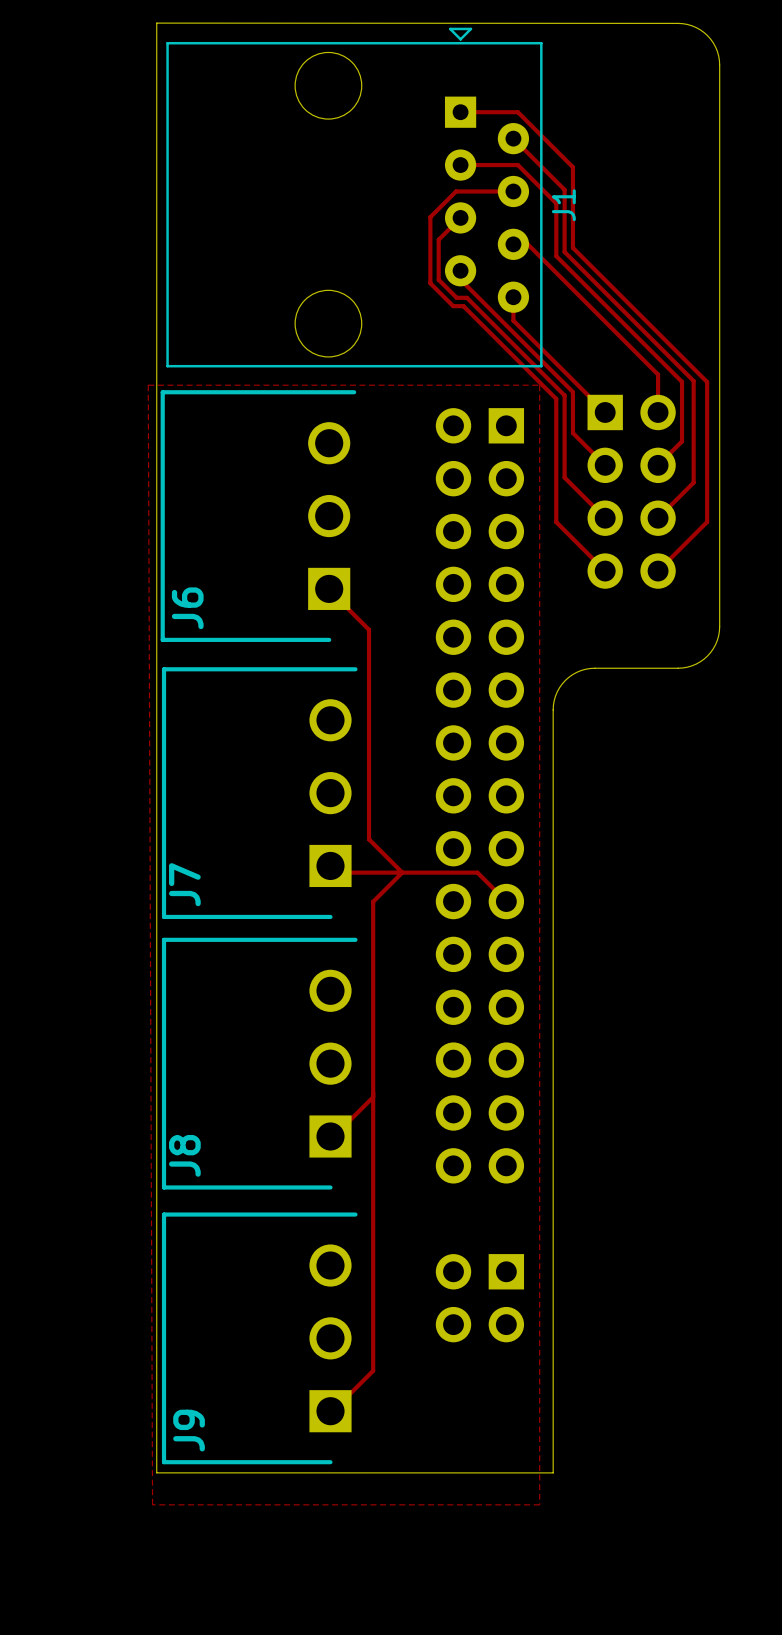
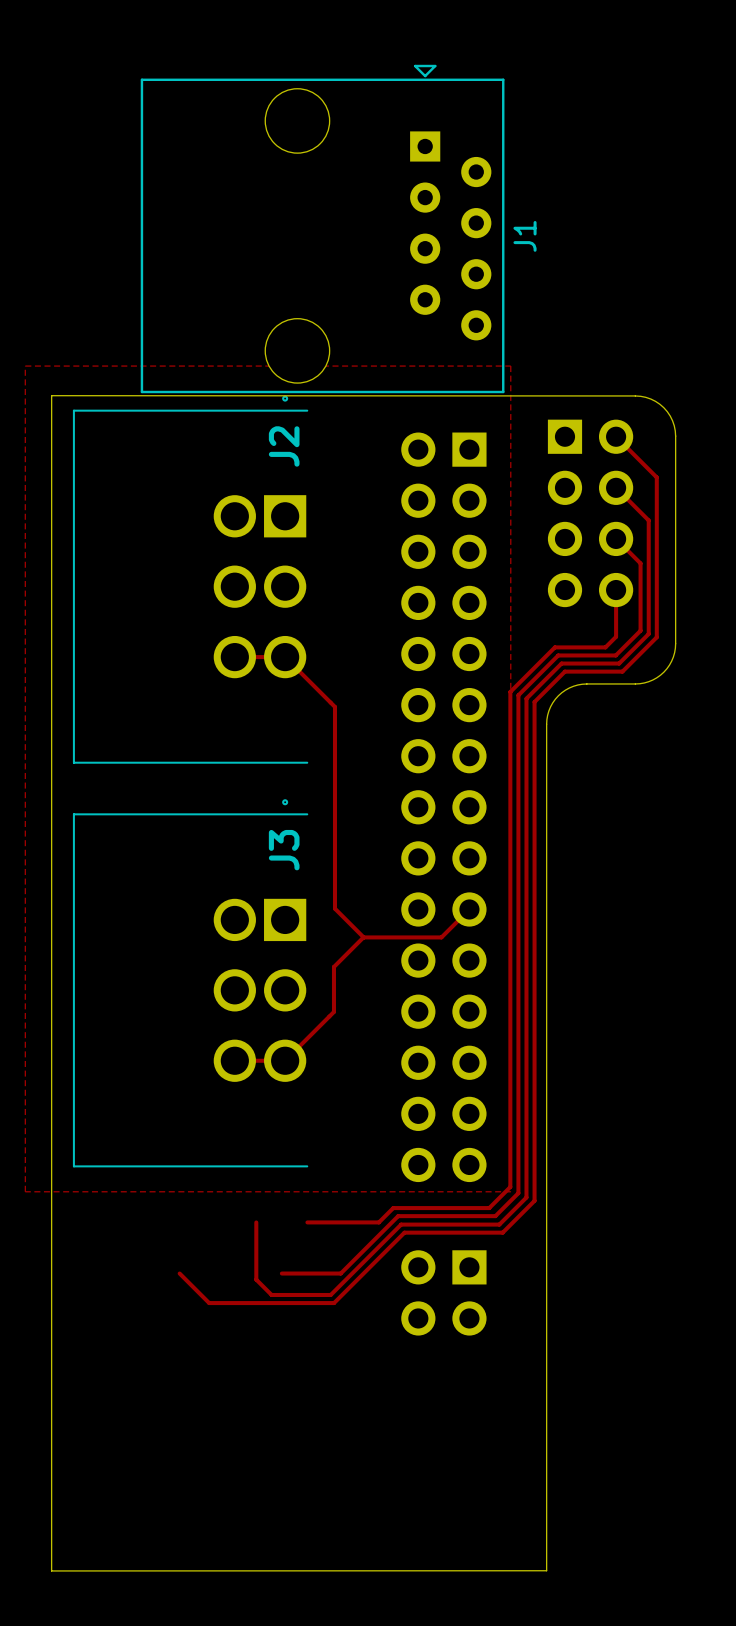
track: (460, 112) (517, 112) (572, 167) (572, 247) (707, 382) (707, 521) (658, 571) -> (307, 1222) (378, 1222) (393, 1208) (489, 1208) (510, 1187) (510, 691) (554, 647) (605, 647) (616, 636) (616, 590)
track: (513, 138) (564, 189) (564, 252) (693, 381) (693, 482) (658, 518) -> (281, 1273) (340, 1273) (398, 1216) (495, 1216) (518, 1193) (518, 695) (558, 655) (615, 655) (640, 630) (640, 563) (616, 538)
track: (460, 165) (517, 165) (556, 203) (556, 256) (682, 381) (682, 441) (658, 465) -> (256, 1222) (256, 1279) (271, 1294) (330, 1294) (401, 1224) (499, 1224) (526, 1197) (526, 698) (561, 663) (619, 663) (648, 633) (648, 520) (616, 487)
track: (513, 191) (456, 191) (430, 217) (430, 283) (453, 306) (463, 306) (556, 398) (556, 522) (605, 571) -> none
track: (460, 217) (438, 239) (438, 279) (456, 297) (466, 297) (564, 395) (564, 477) (605, 518) -> none
track: (513, 244) (527, 244) (658, 374) (658, 412) -> (179, 1273) (209, 1303) (334, 1303) (404, 1232) (502, 1232) (534, 1200) (534, 701) (564, 671) (622, 671) (656, 637) (656, 477) (616, 436)
track: (460, 270) (460, 279) (572, 392) (572, 433) (605, 465) -> none
track: (513, 297) (513, 320) (605, 412) -> none
zone outline: (148, 385) (539, 385) (539, 1504) (152, 1504) (148, 385) -> (25, 366) (25, 1191) (510, 1191) (510, 366) (25, 366)
board edge: (719, 411) (719, 65) (717, 51) (713, 42) (700, 29) (691, 25) (678, 23) (156, 23) (156, 1472) (553, 1472) (553, 705) (555, 696) (562, 683) (576, 672) (590, 668) (627, 668) -> (675, 436) (672, 420) (663, 407) (650, 399) (635, 395) (51, 395) (51, 1570) (546, 1570) (546, 724) (550, 706) (558, 695) (573, 686) (586, 683)
J6: (258, 516) -> none
J2: none -> (190, 579)
track: (331, 591) (369, 629) (369, 839) (402, 872) (373, 901) (373, 1370) (331, 1412) -> none
J7: (259, 793) -> none
track: (331, 865) (338, 872) (477, 872) (506, 901) -> (234, 657) (285, 657) (335, 706) (335, 908) (363, 937) (441, 937) (469, 909)
track: none -> (363, 937) (333, 966) (333, 1011) (285, 1060) (234, 1060)
J3: none -> (190, 983)
J8: (259, 1063) -> none
track: (373, 1097) (331, 1139) -> none
J9: (259, 1338) -> none

